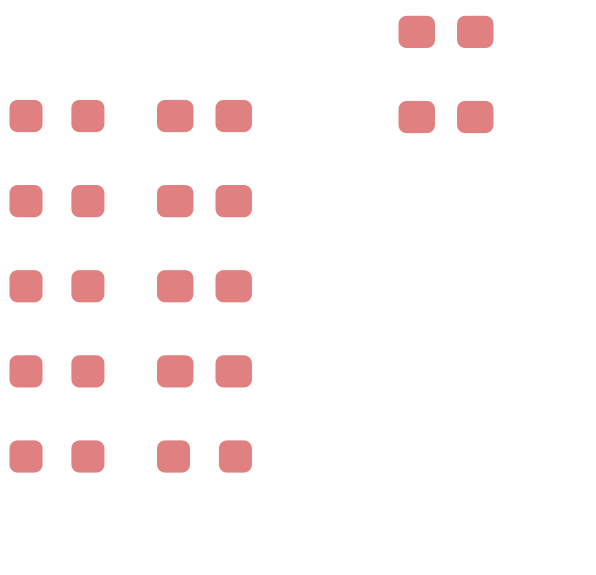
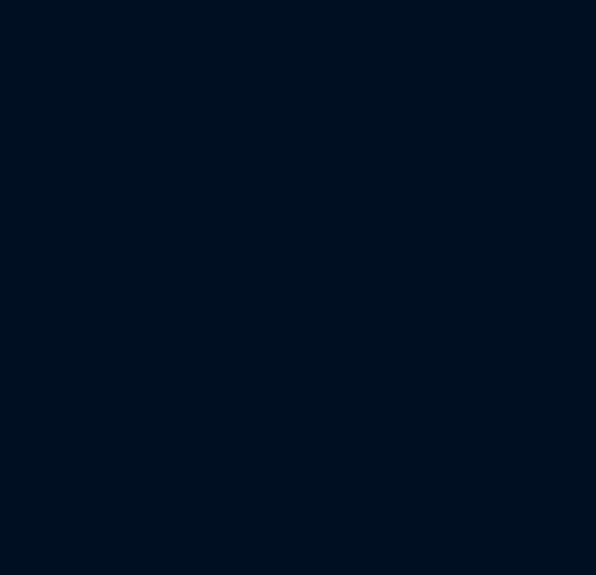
part: (446, 31) -> none
part: (56, 116) -> none
part: (204, 116) -> none
part: (446, 117) -> none
part: (56, 201) -> none
part: (204, 201) -> none
part: (56, 286) -> none
part: (204, 286) -> none
part: (56, 371) -> none
part: (204, 371) -> none
part: (56, 456) -> none
part: (204, 456) -> none

